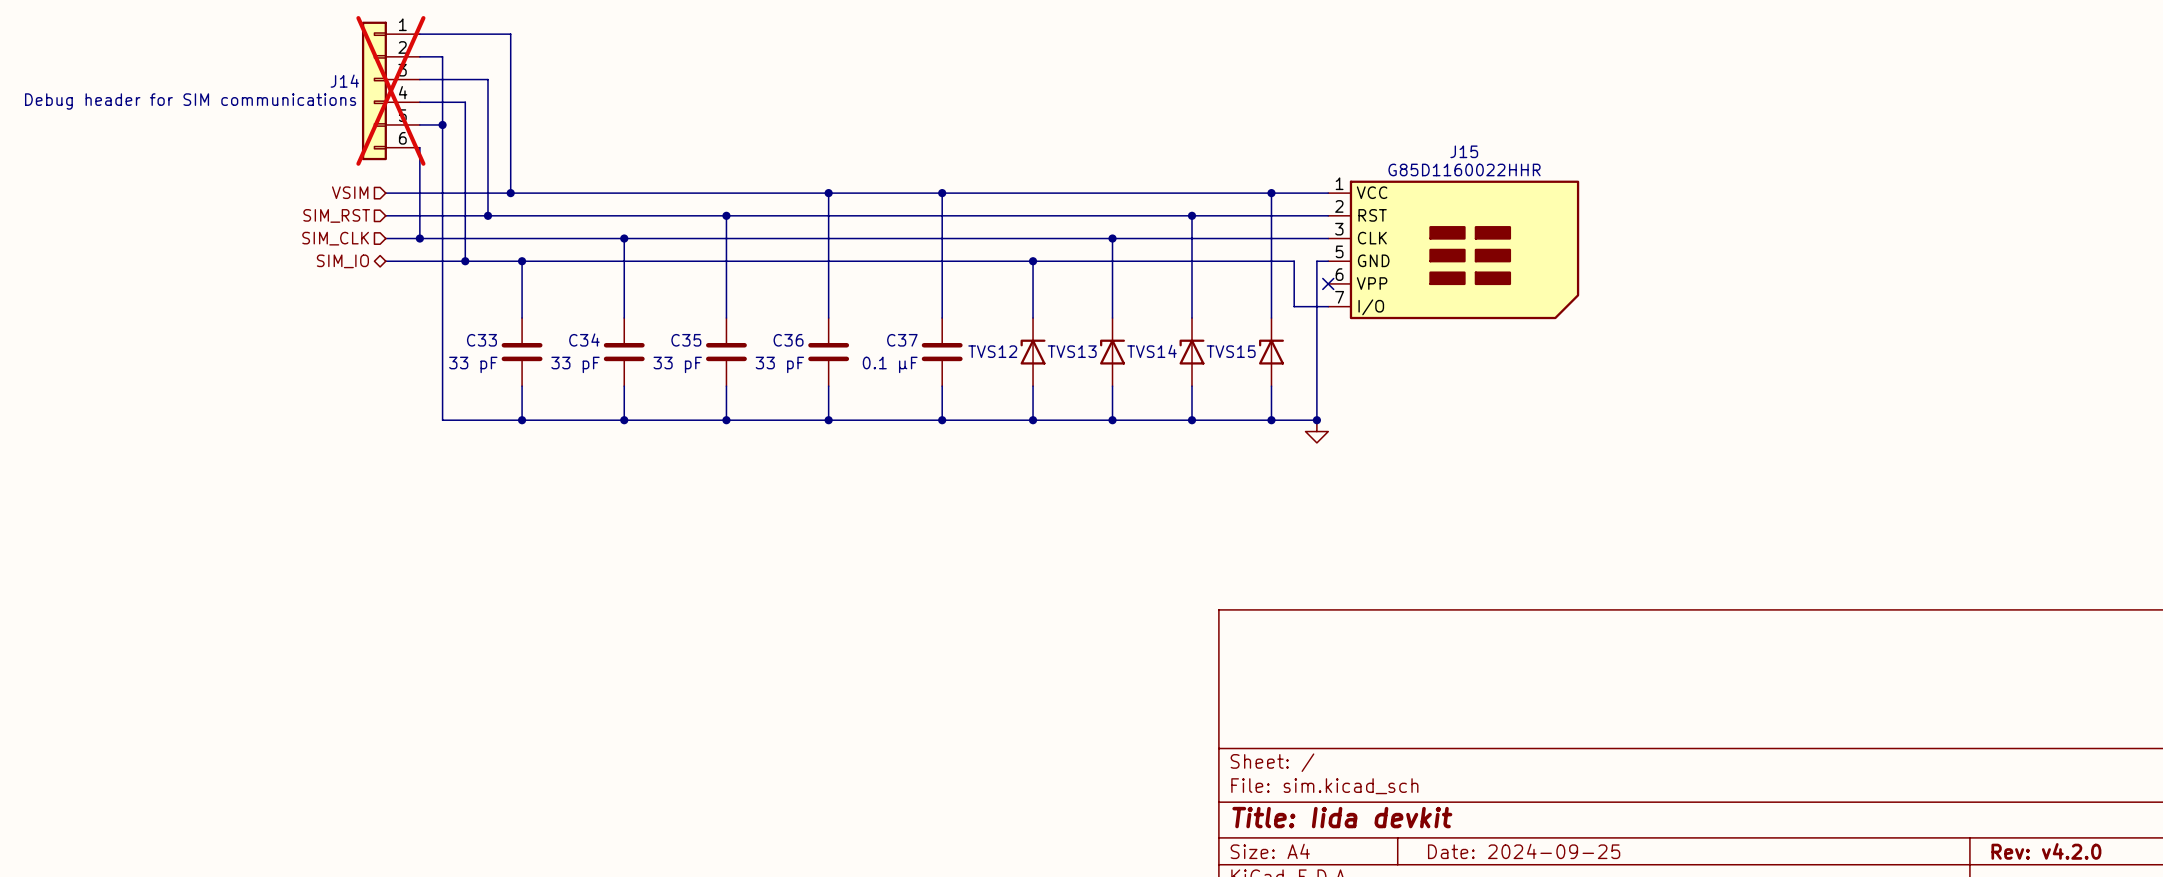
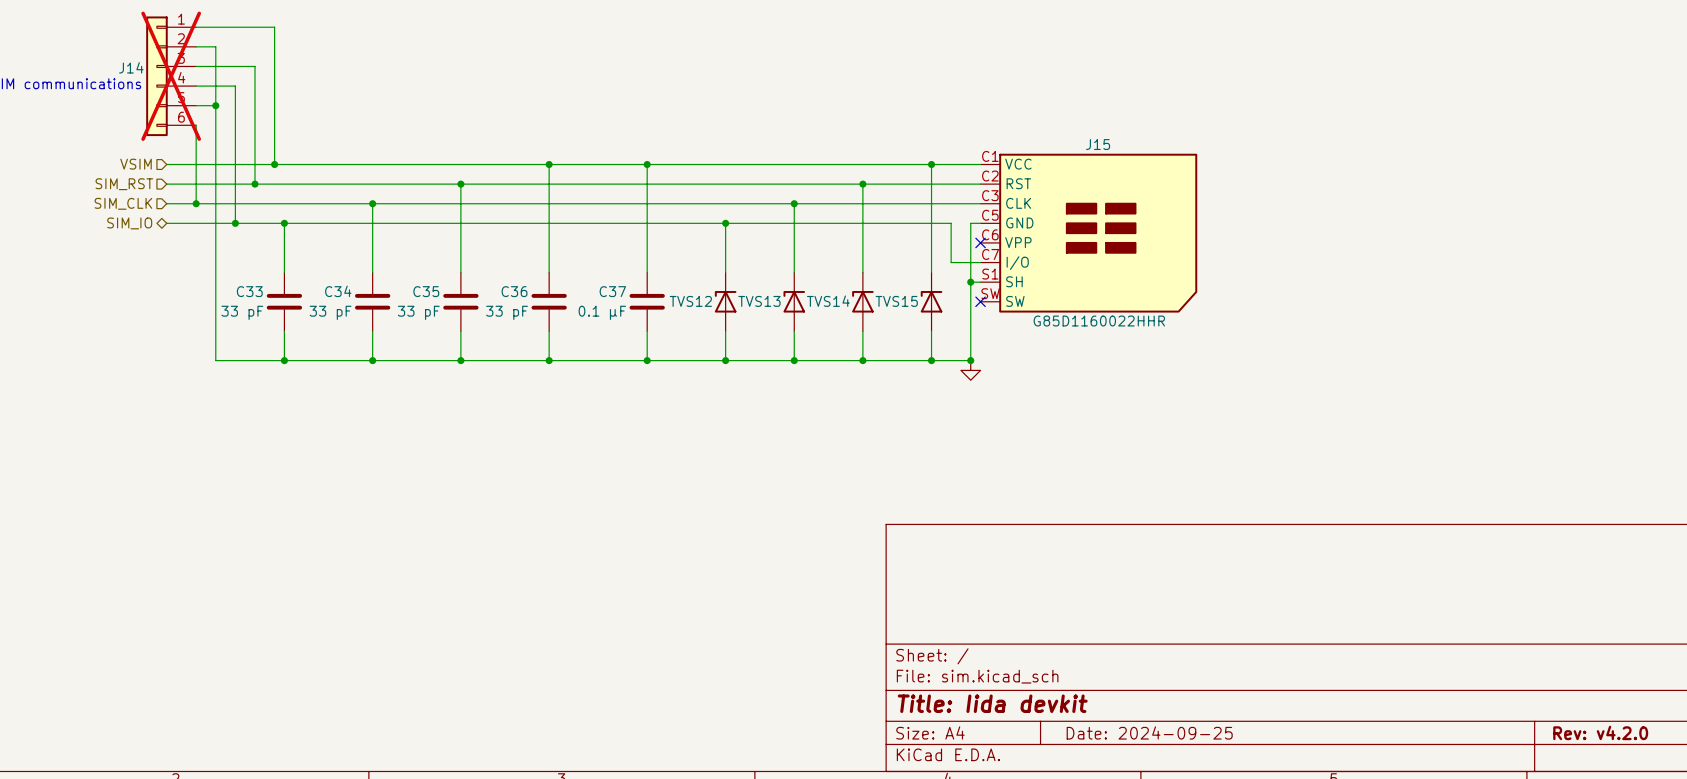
J15 value position: G85D1160022HHR (1464, 169) -> G85D1160022HHR (1099, 321)
J15 symbol: [1328, 180, 1580, 320] -> [980, 153, 1198, 313]
wire: none -> (970, 282) (980, 282)
junction: none -> (970, 282)
no-connect mark: none -> (980, 301)

